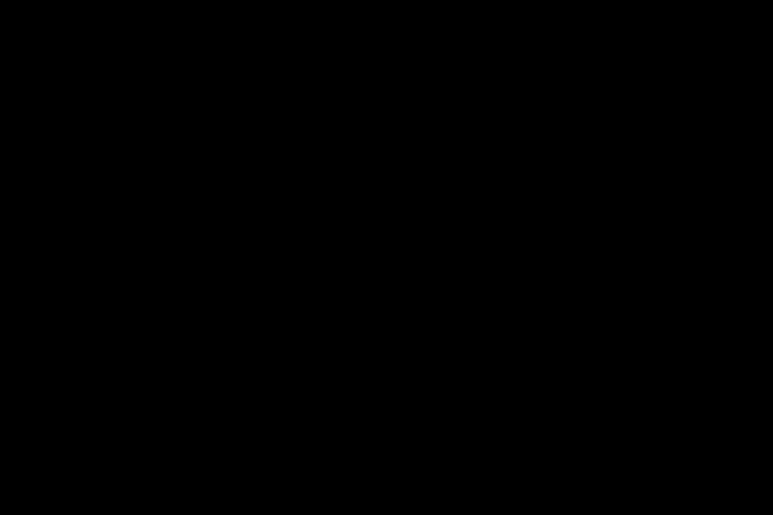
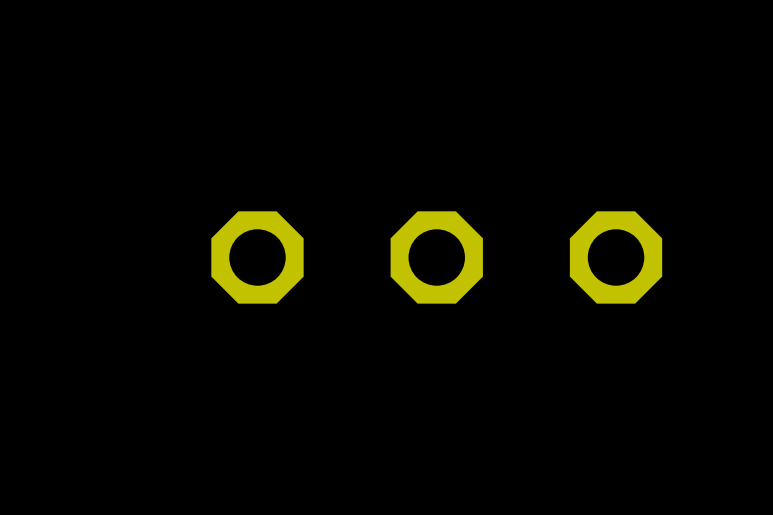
part: none -> (436, 257)

